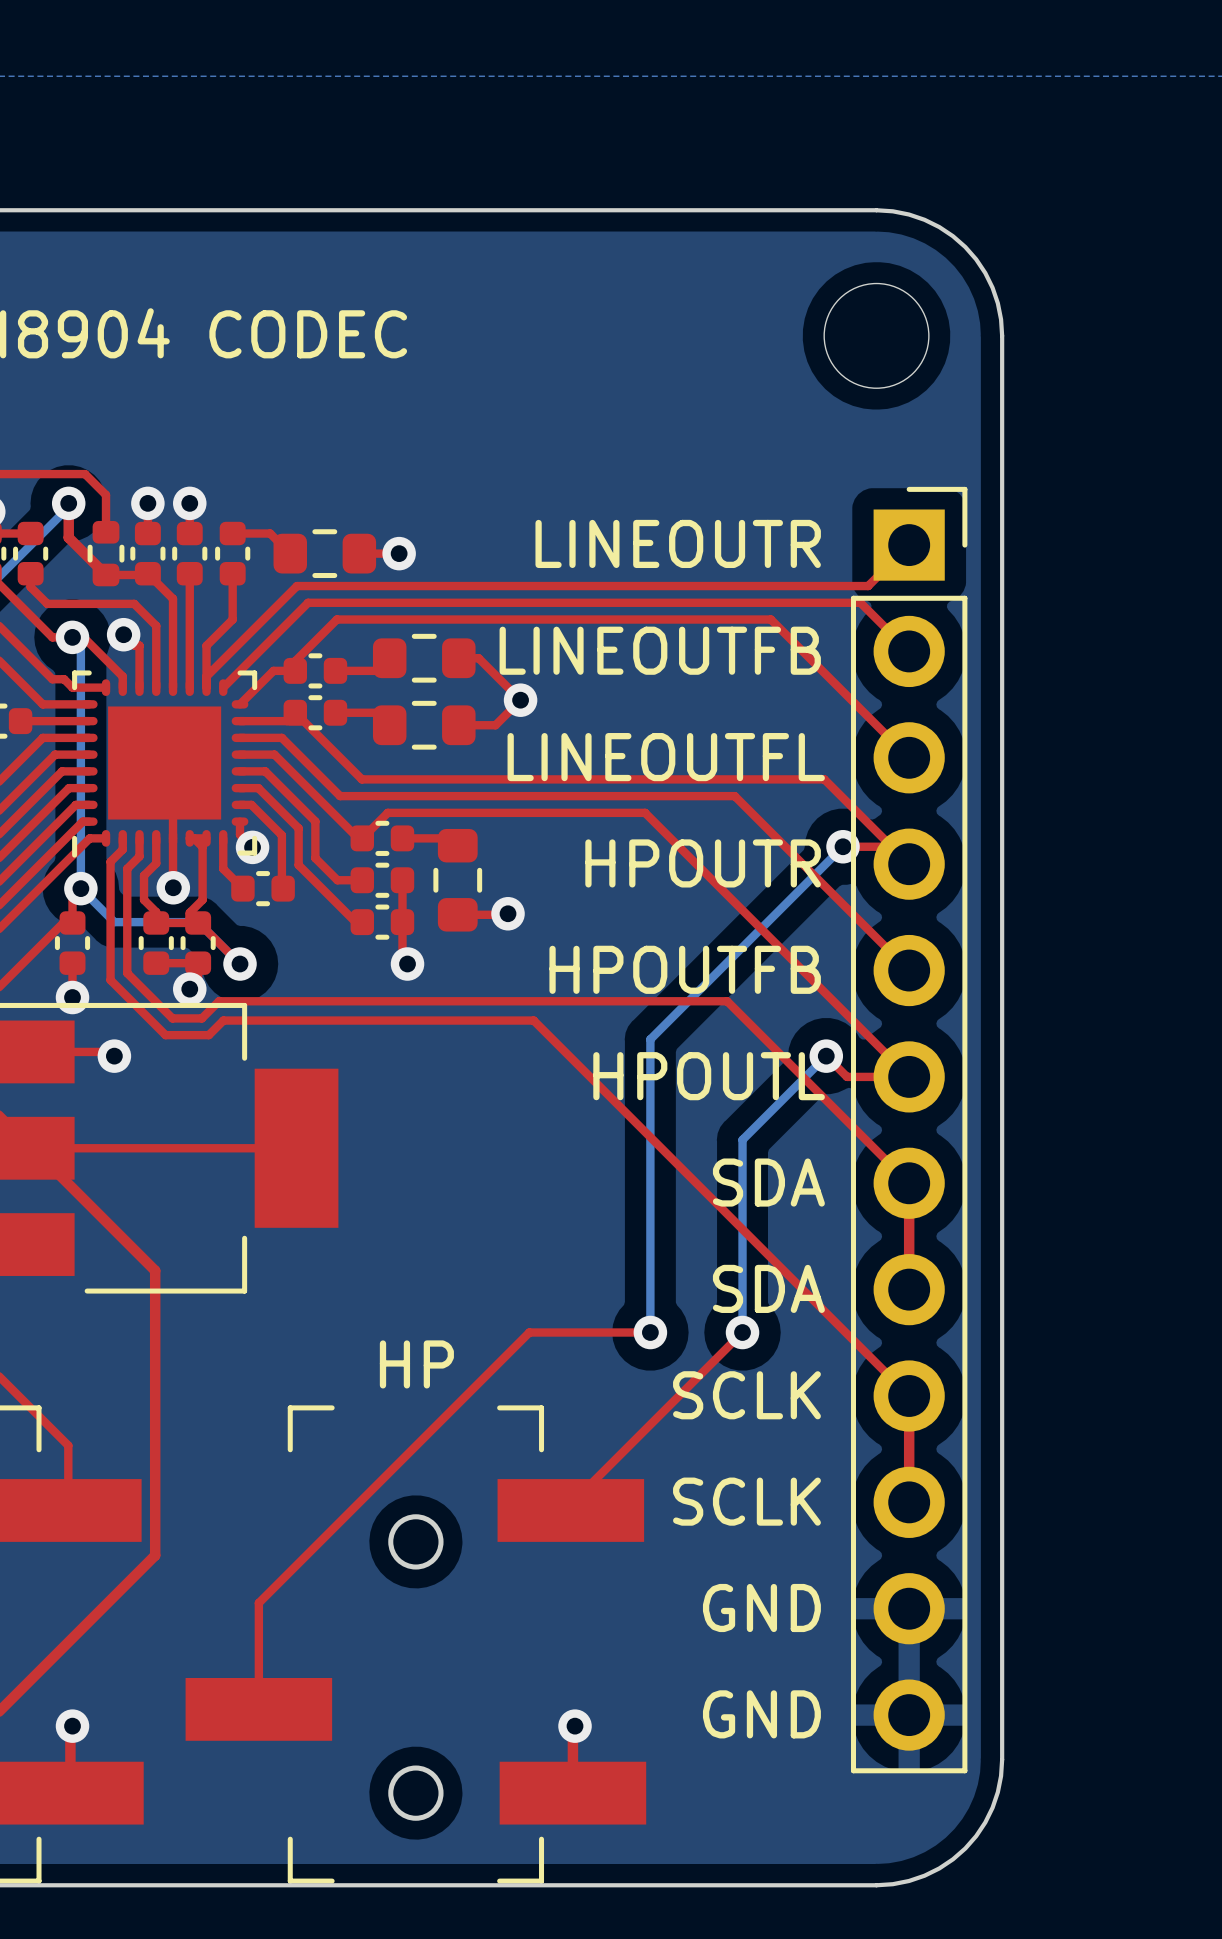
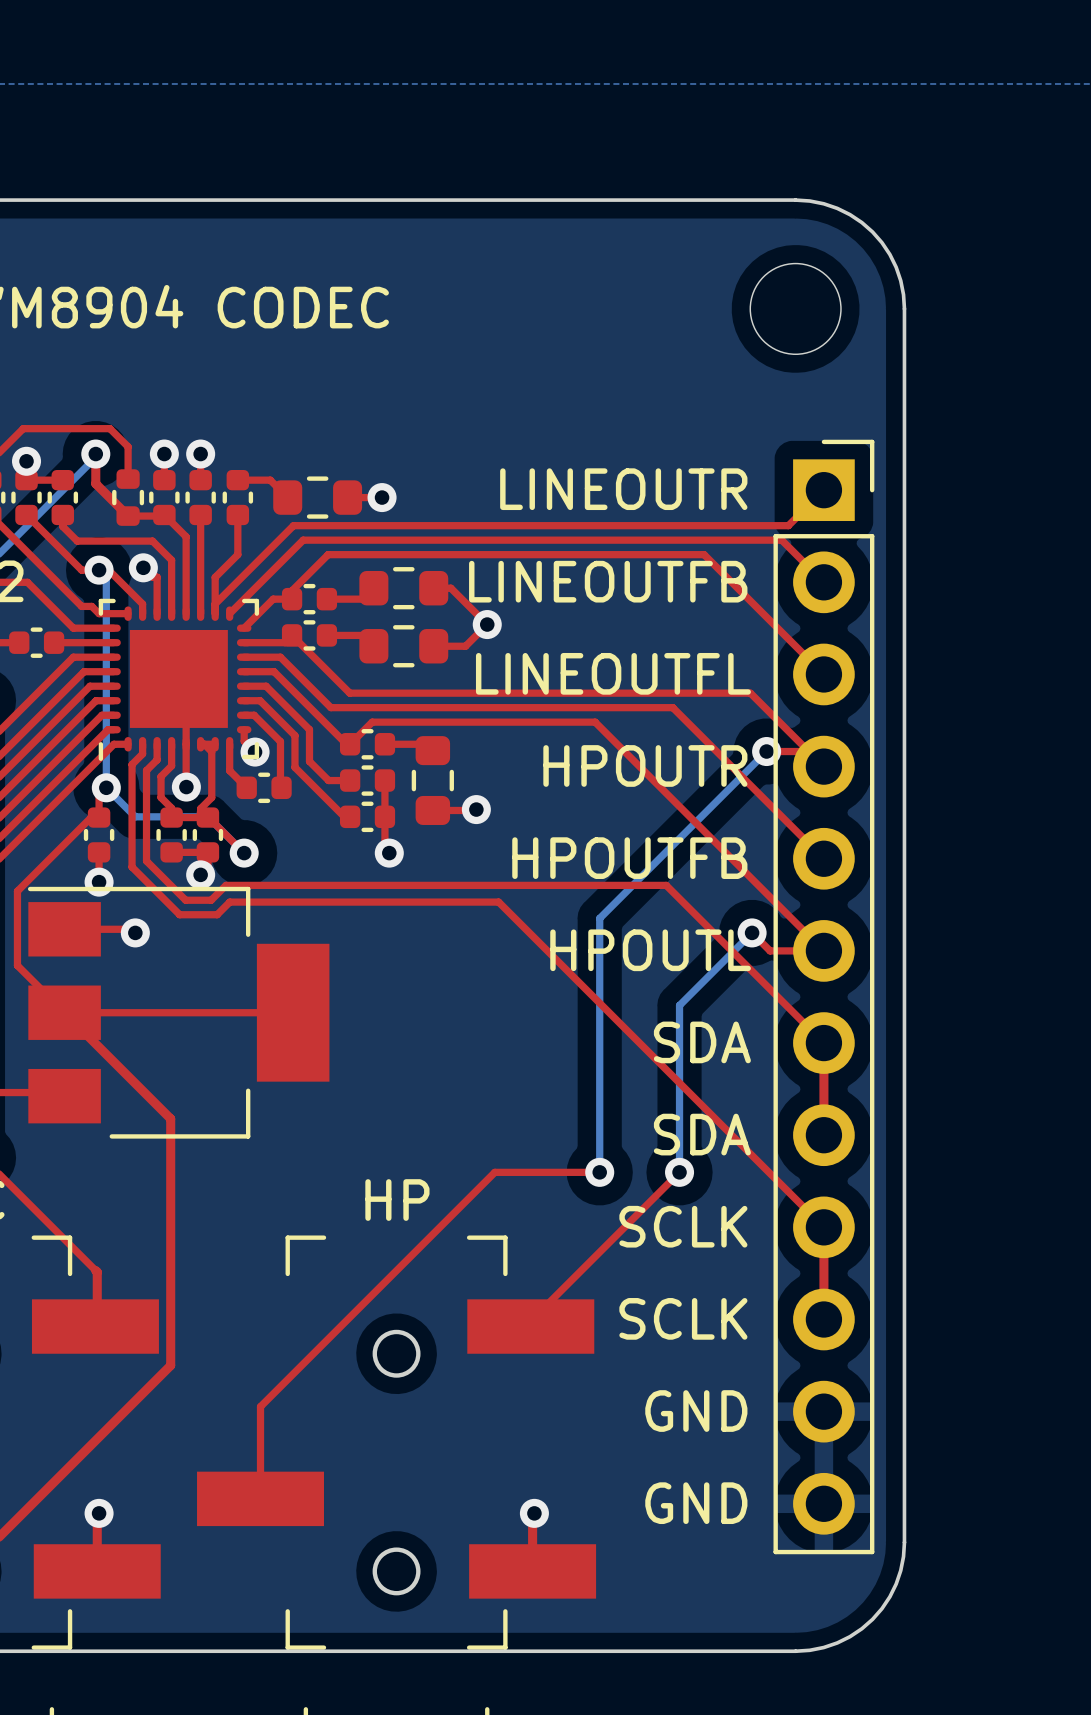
top track: (68, 1445) (68, 1514) -> (95, 1270) (97, 1272) (97, 1317)

